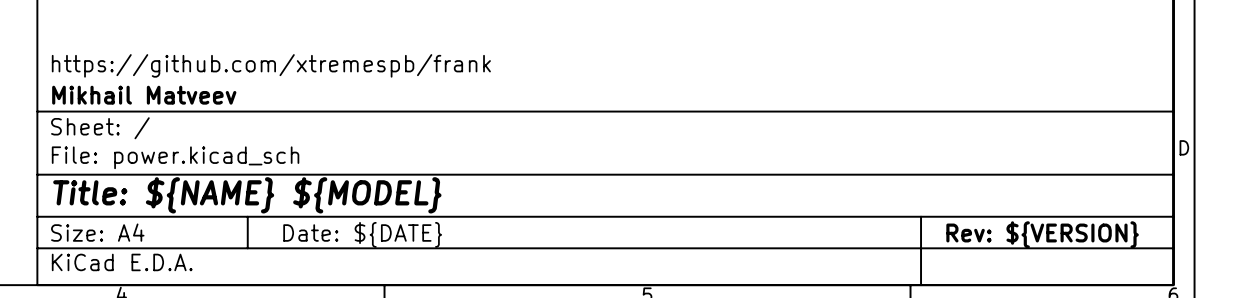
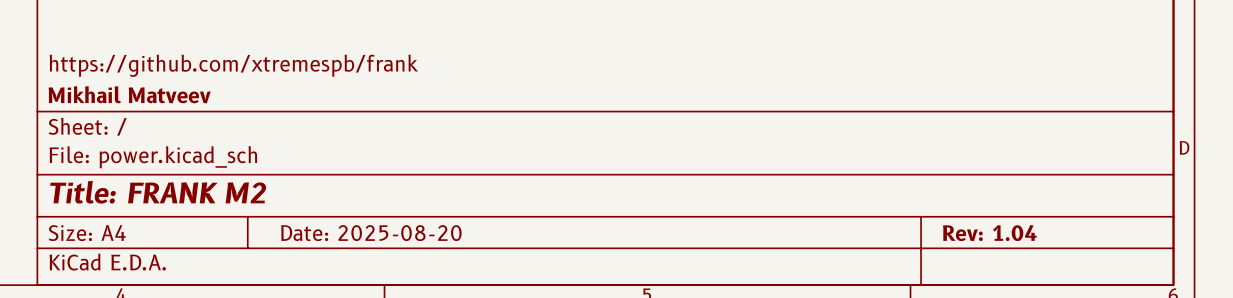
title block: Title: ${NAME} ${MODEL} (247, 195) -> Title: FRANK M2 (158, 192)
title block: Date: ${DATE} (362, 234) -> Date: 2025-08-20 (371, 233)
title block: Rev: ${VERSION} (1042, 234) -> Rev: 1.04 (989, 233)

